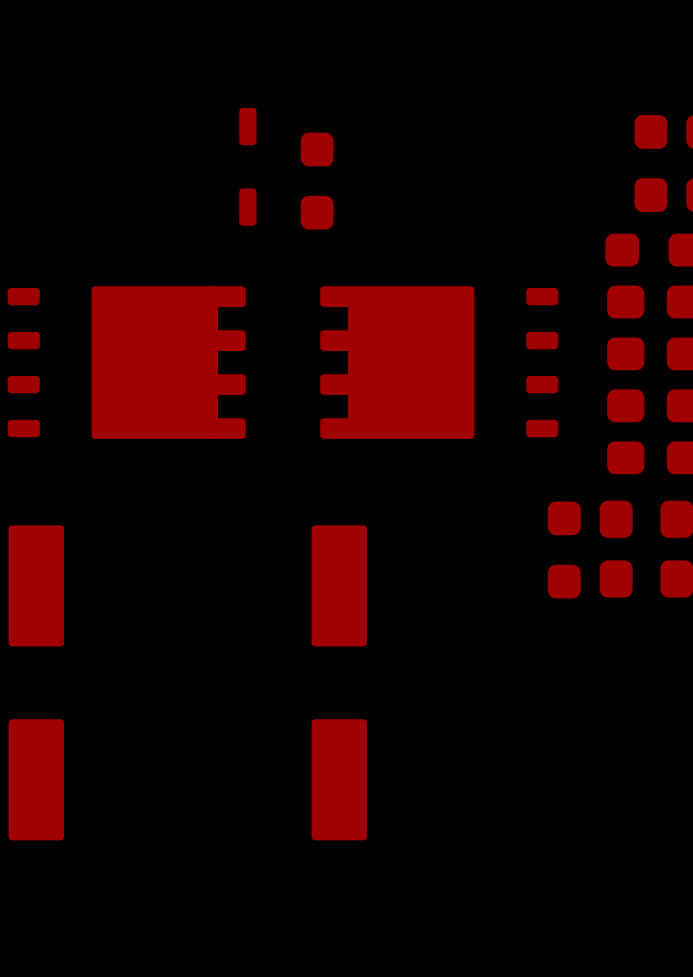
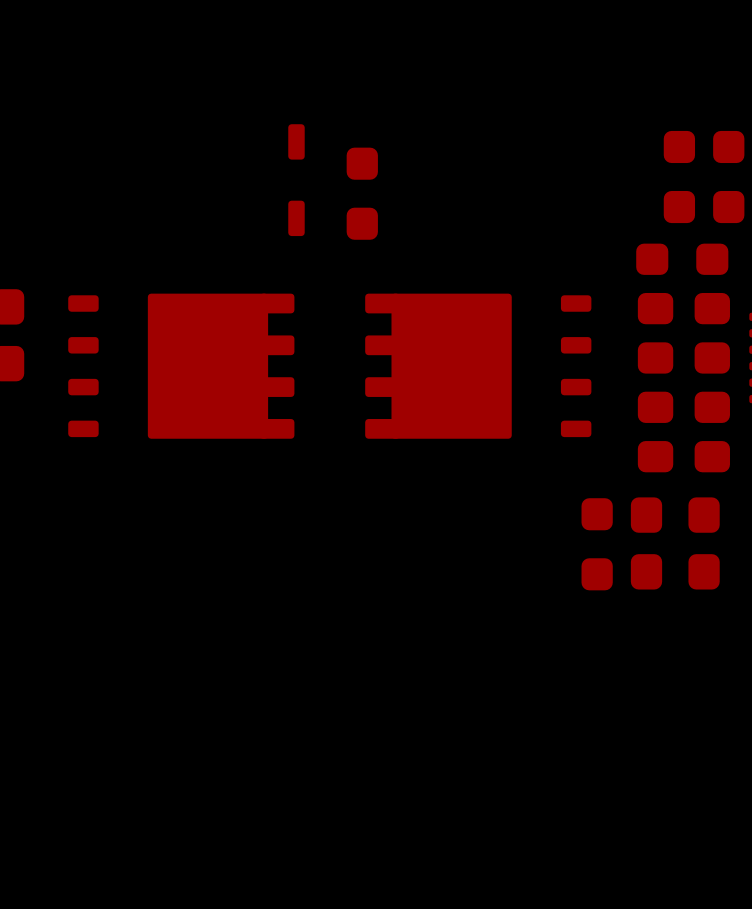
part: (36, 682) -> none
part: (339, 682) -> none

